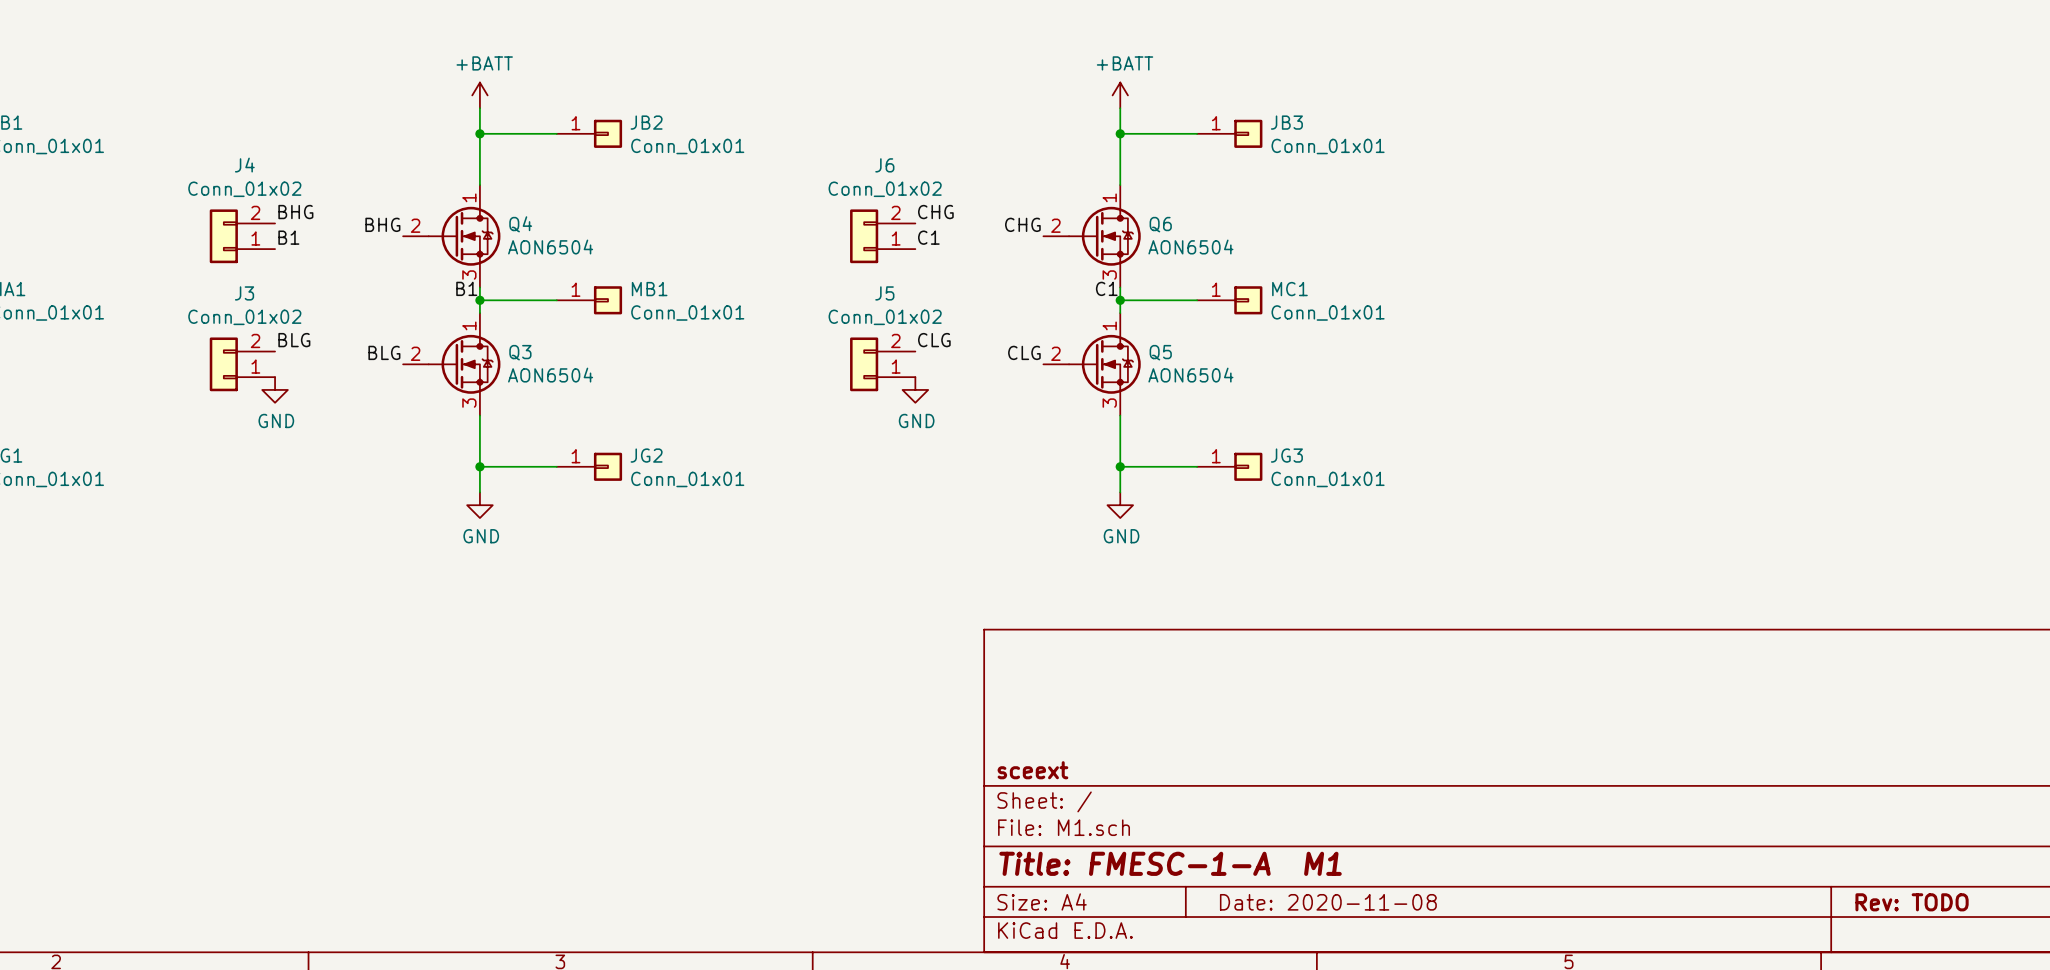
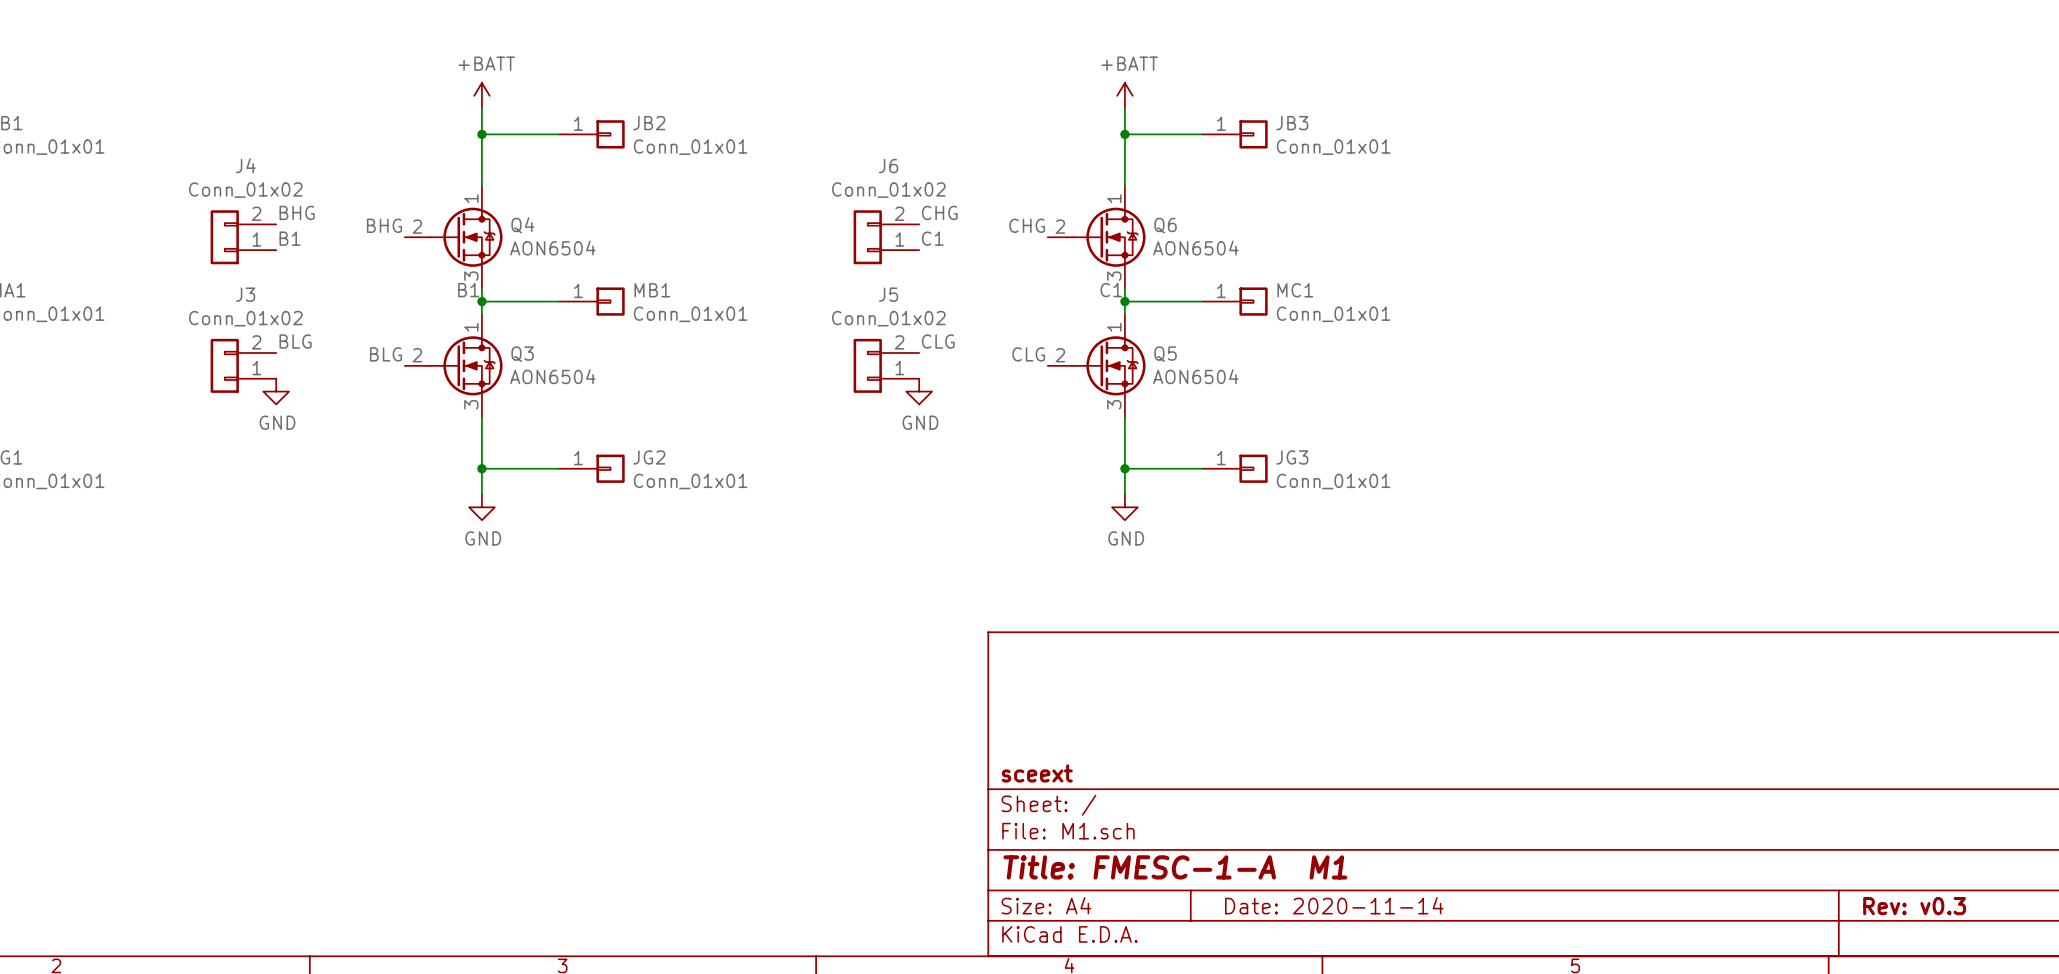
title block: Date: 2020-11-08 (1328, 902) -> Date: 2020-11-14 (1334, 905)
title block: Rev: TODO (1912, 902) -> Rev: v0.3 (1914, 906)

